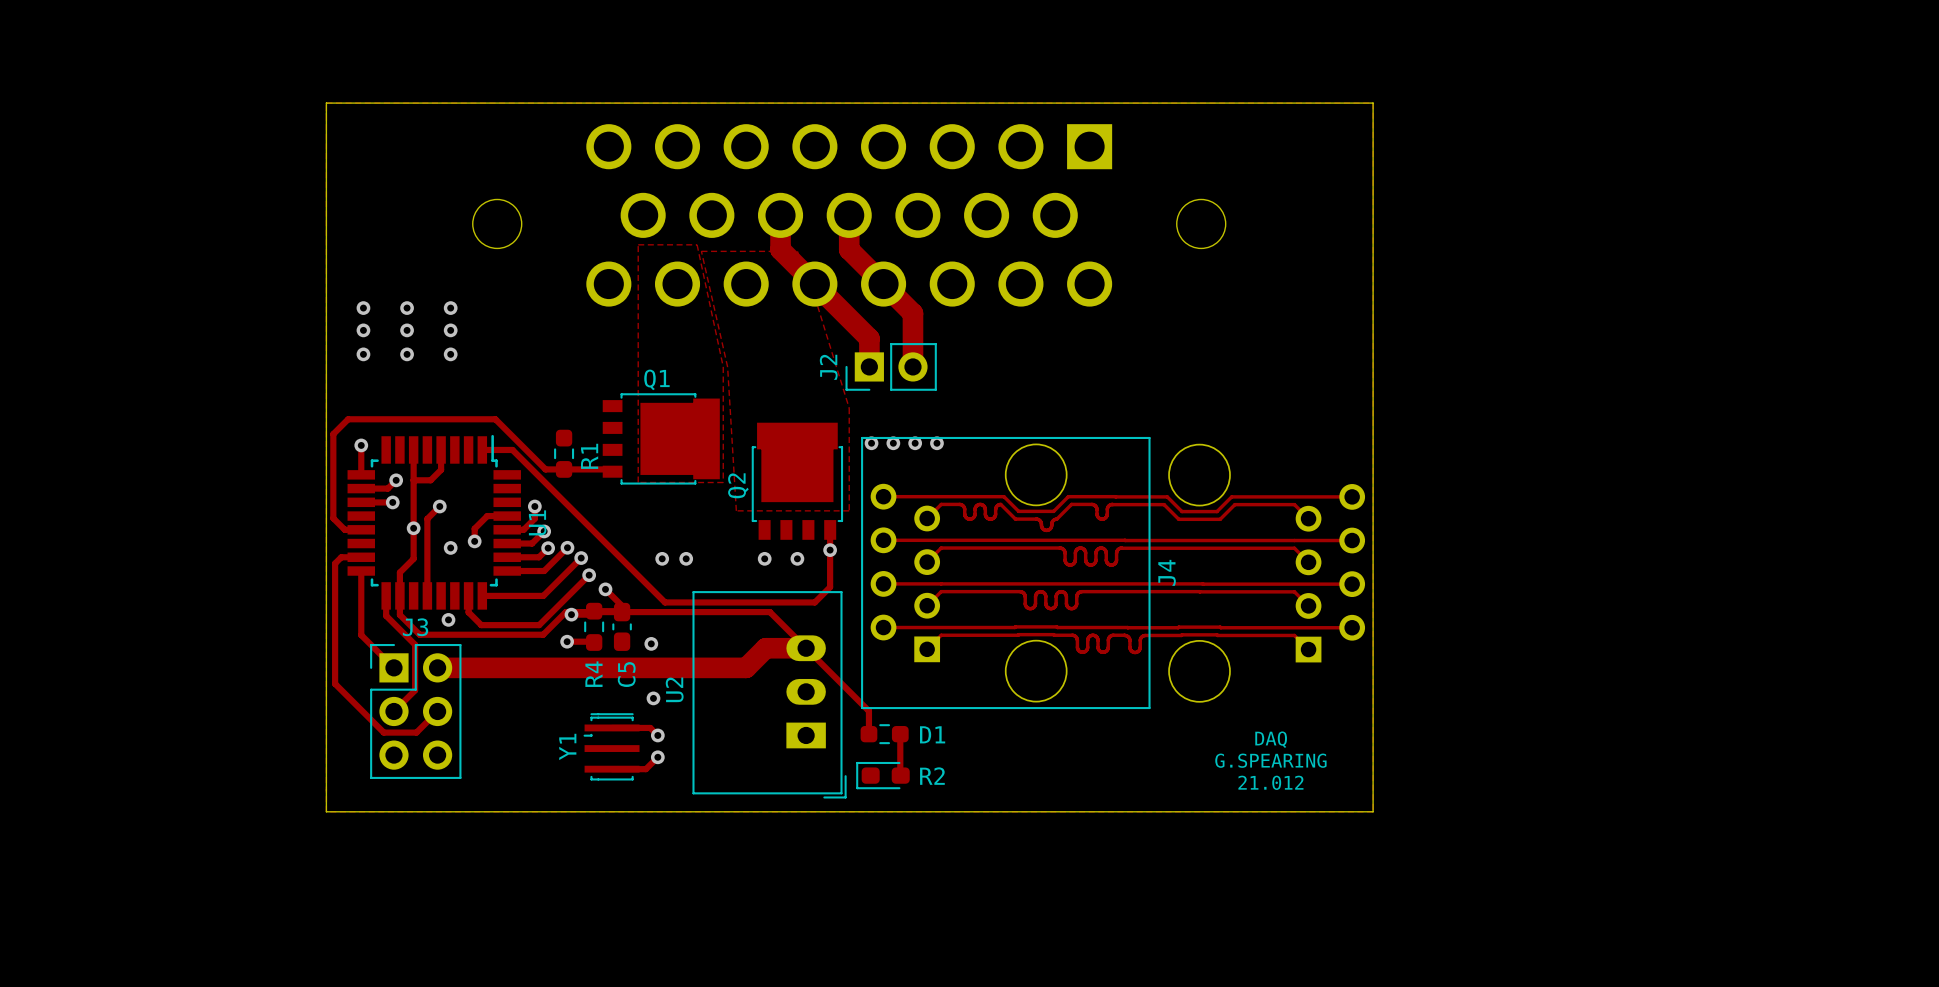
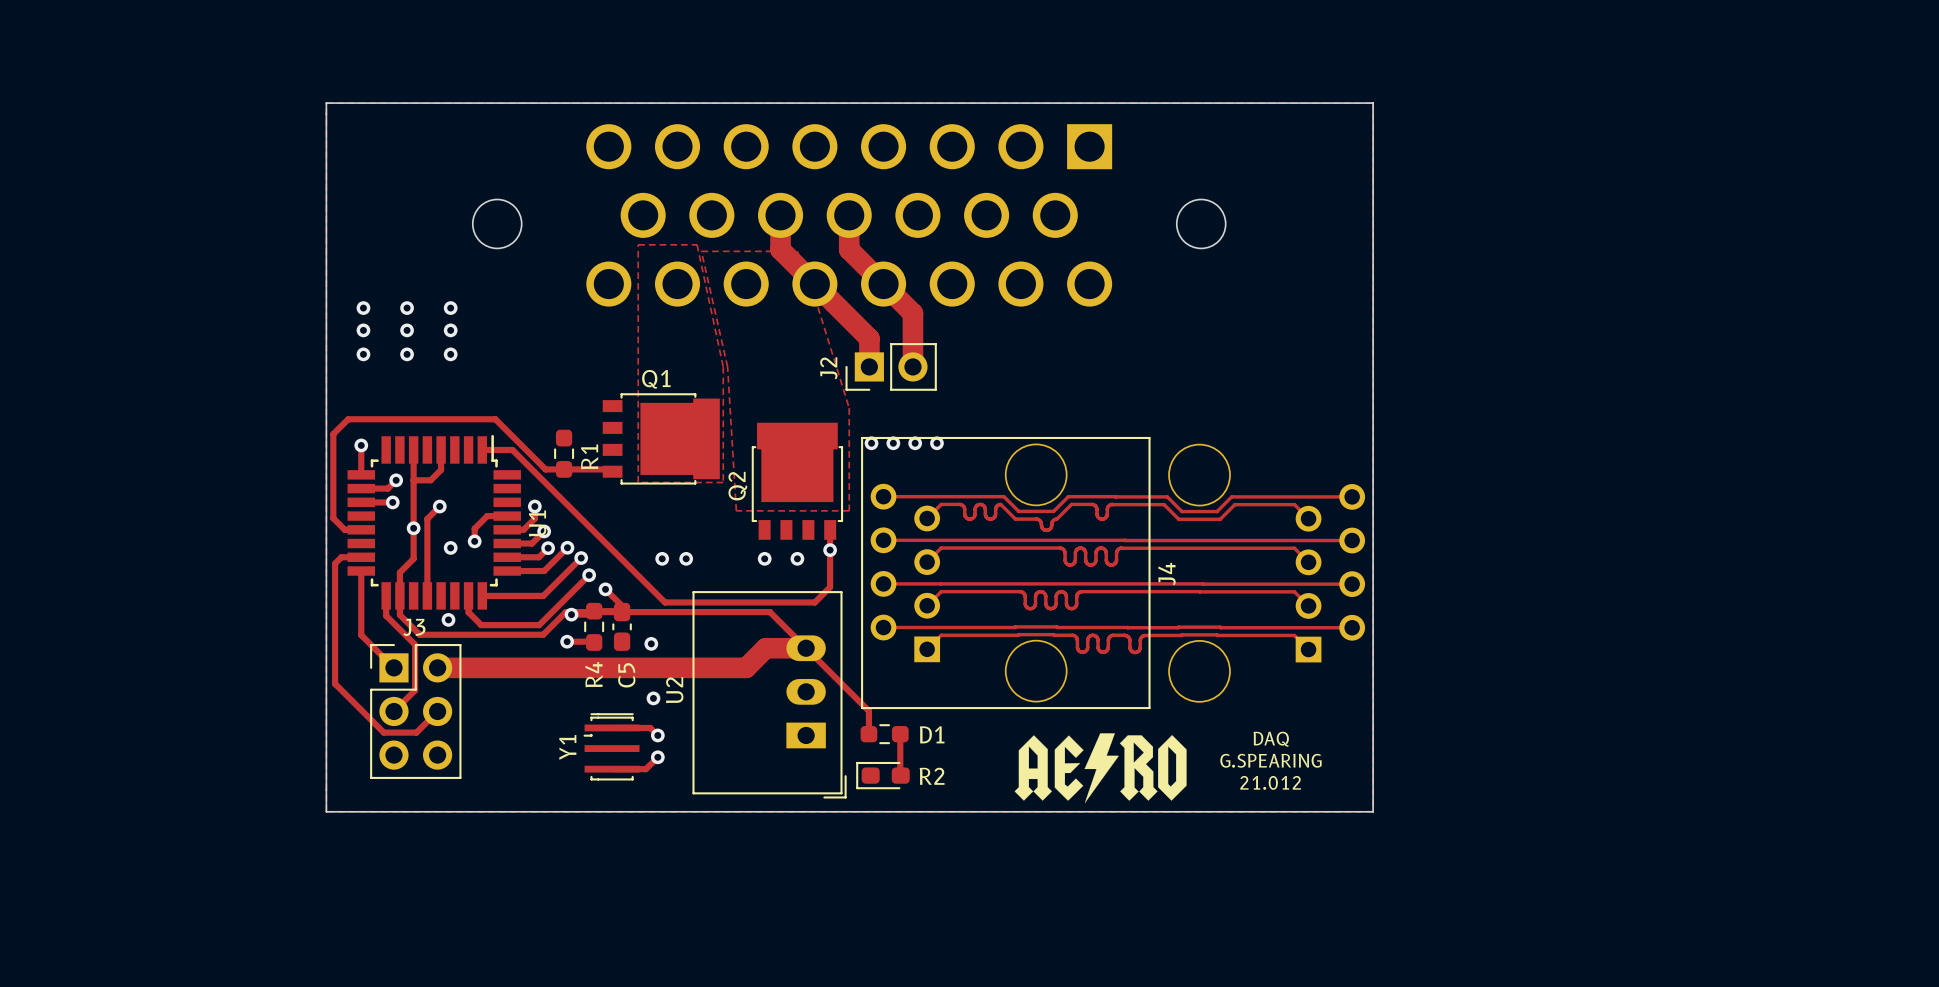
drawing: none -> [1014, 733, 1187, 803]

